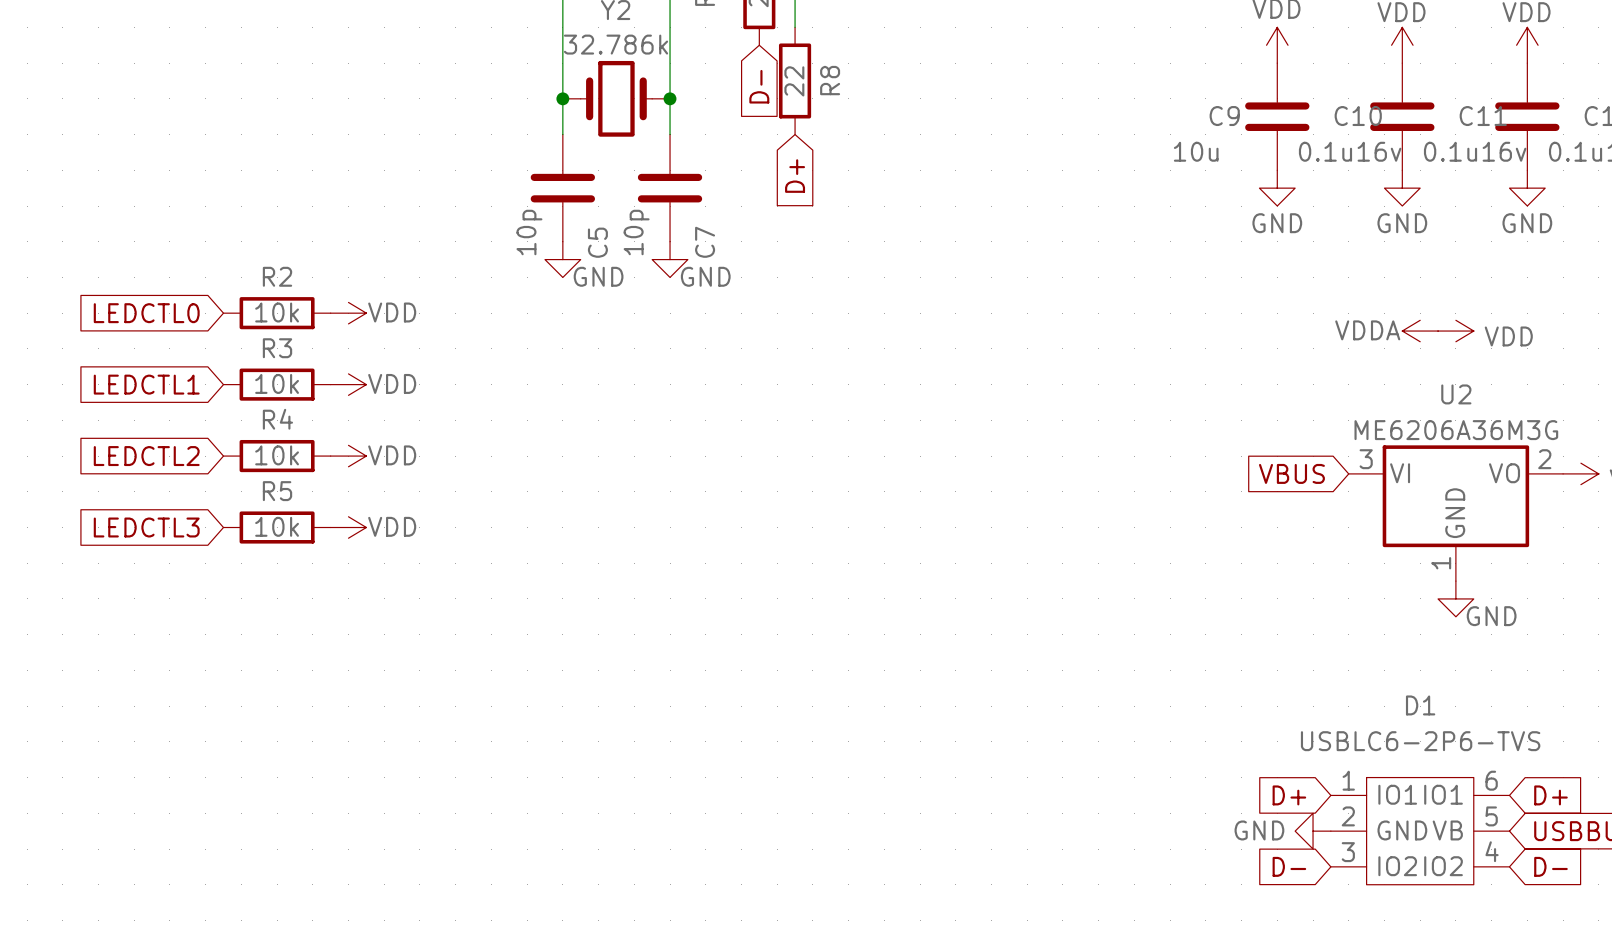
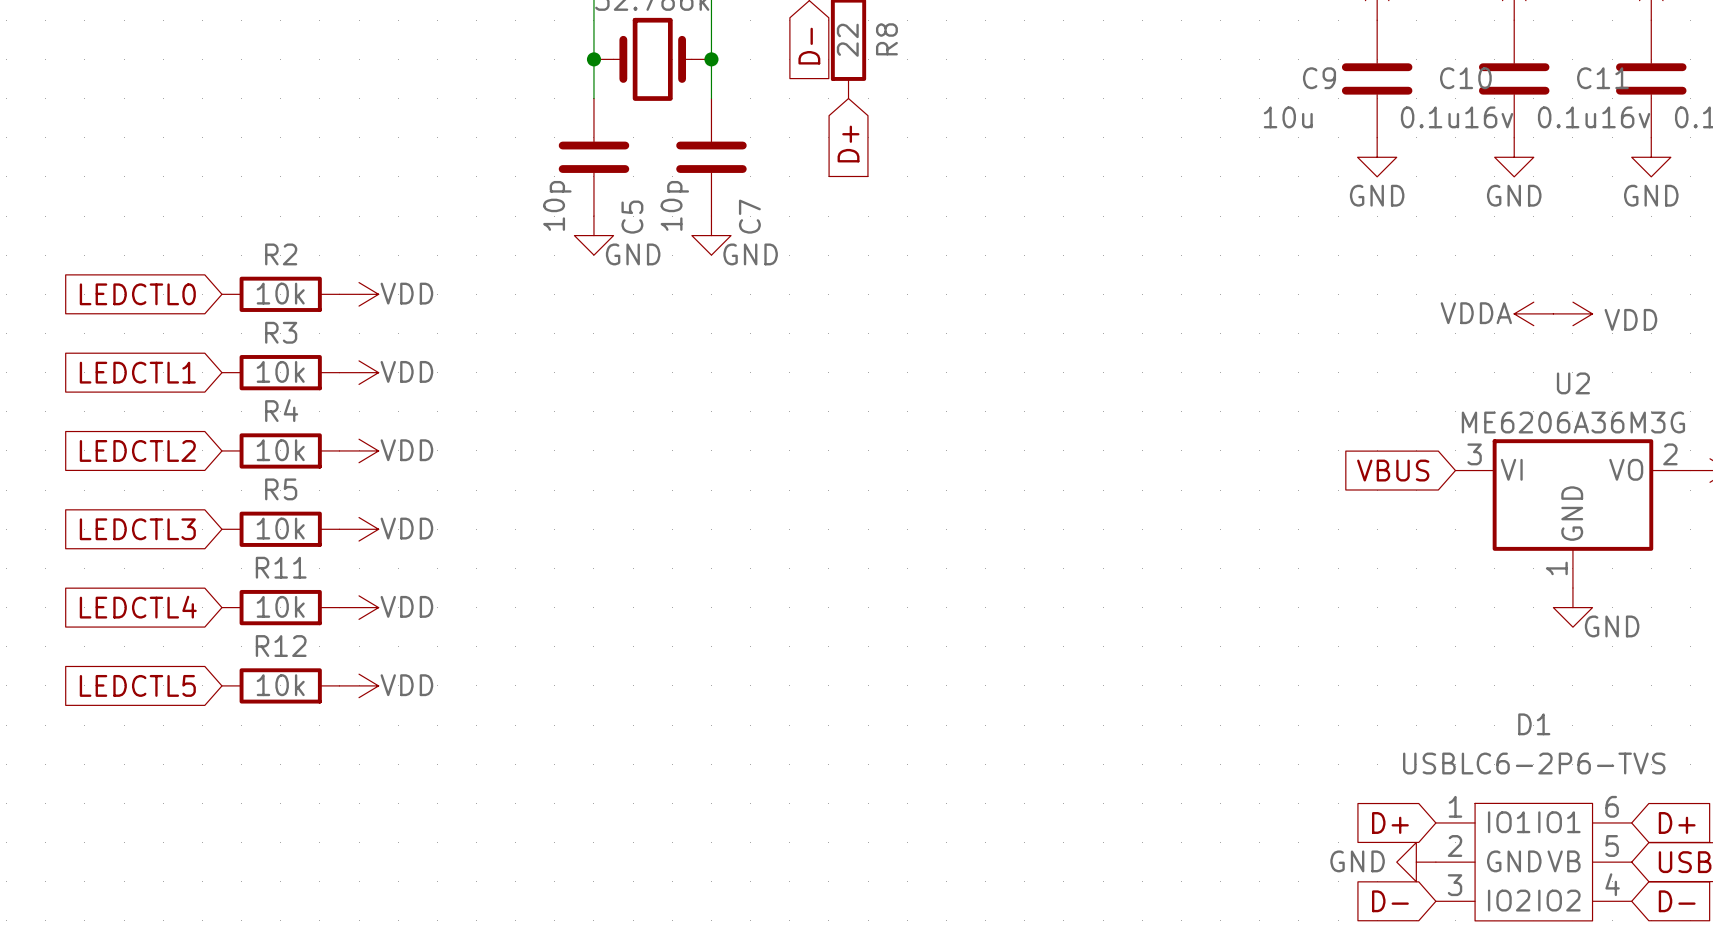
global label: none -> LEDCTL4 (138, 607)
R11: none -> 10k (280, 607)
power symbol: none -> VDD (359, 607)
global label: none -> LEDCTL5 (137, 685)
R12: none -> 10k (280, 685)
power symbol: none -> VDD (359, 685)

